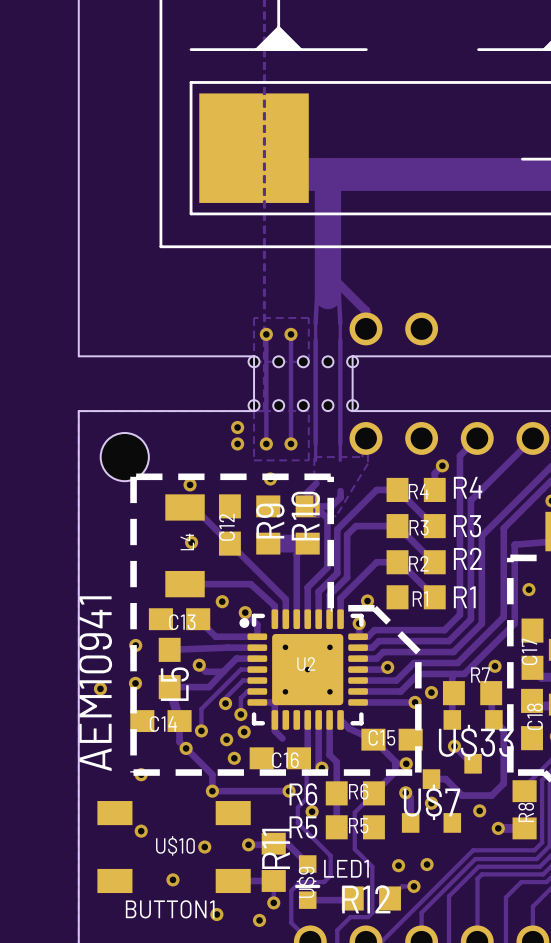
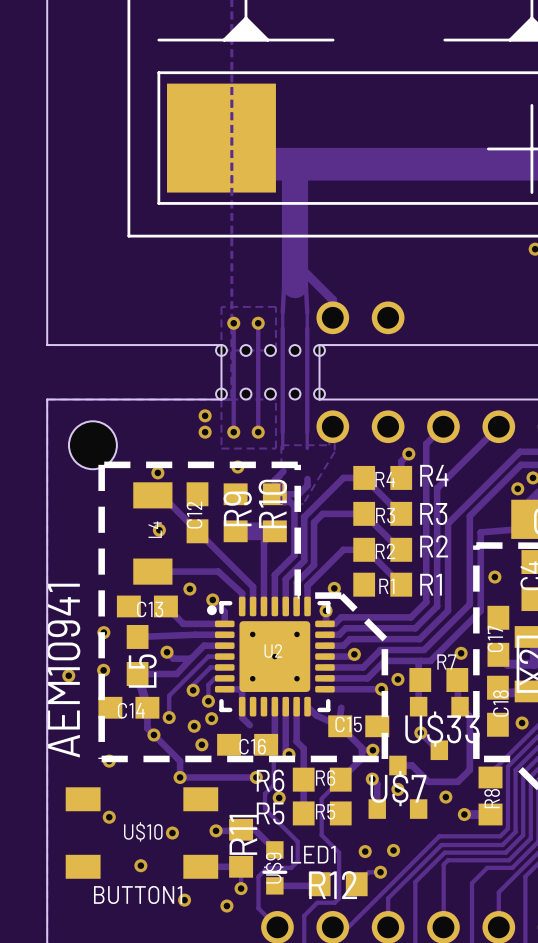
track: none -> (341, 707) (340, 715)

